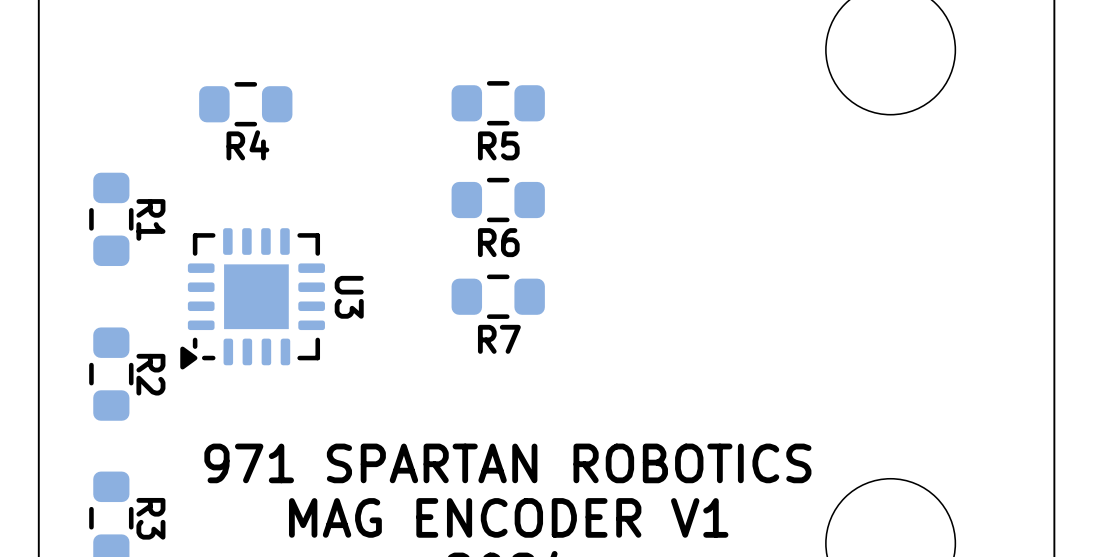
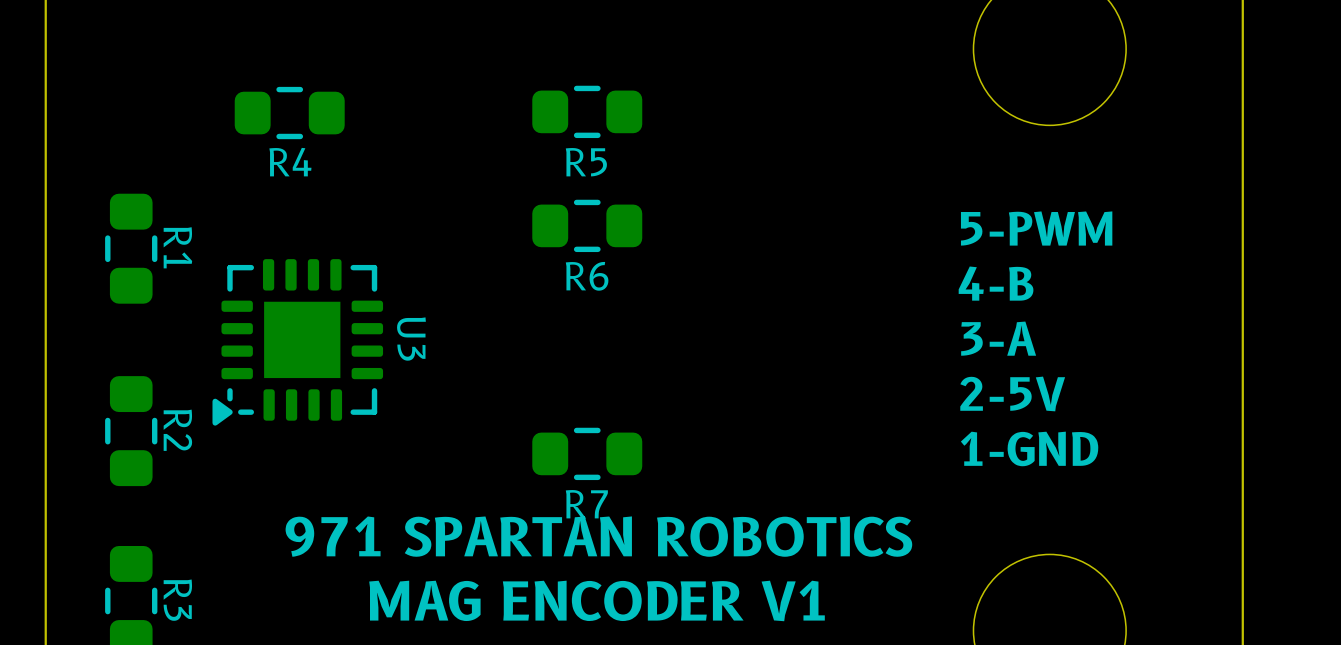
text: none -> 5-PWM (1036, 228)
text: none -> 4-B (996, 283)
text: none -> 3-A (998, 338)
R7 position: (498, 296) -> (587, 453)
text: none -> 2-5V (1012, 393)
text: none -> 1-GND (1029, 448)

